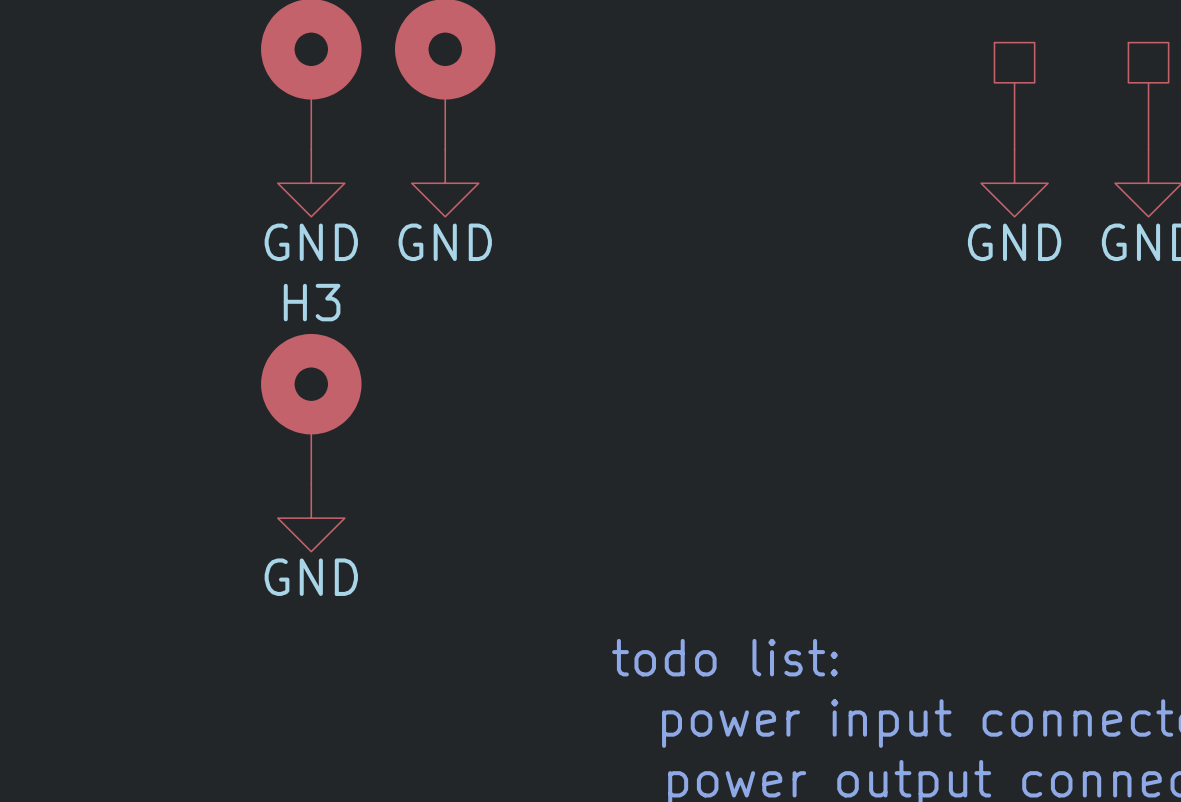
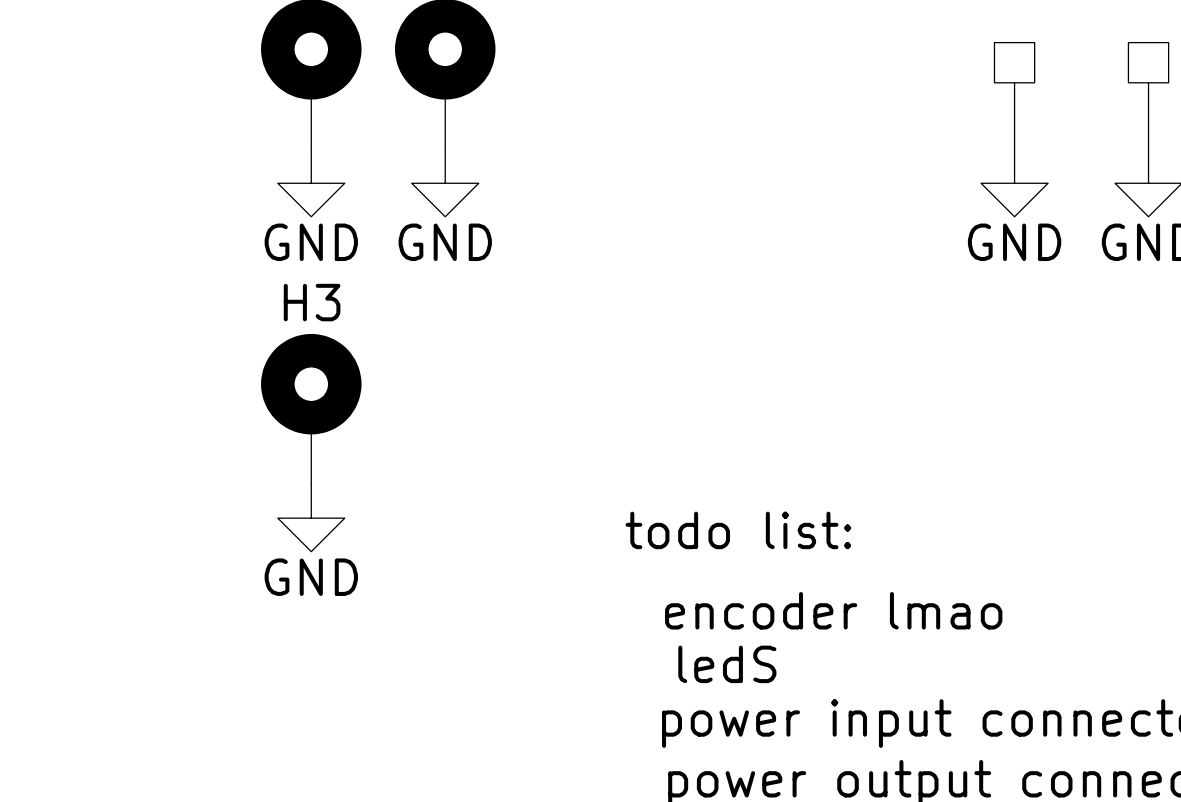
text: none -> todo list: (738, 530)
text: none -> encoder lmao (833, 610)
text: todo list: (724, 657) -> ledS (727, 664)

